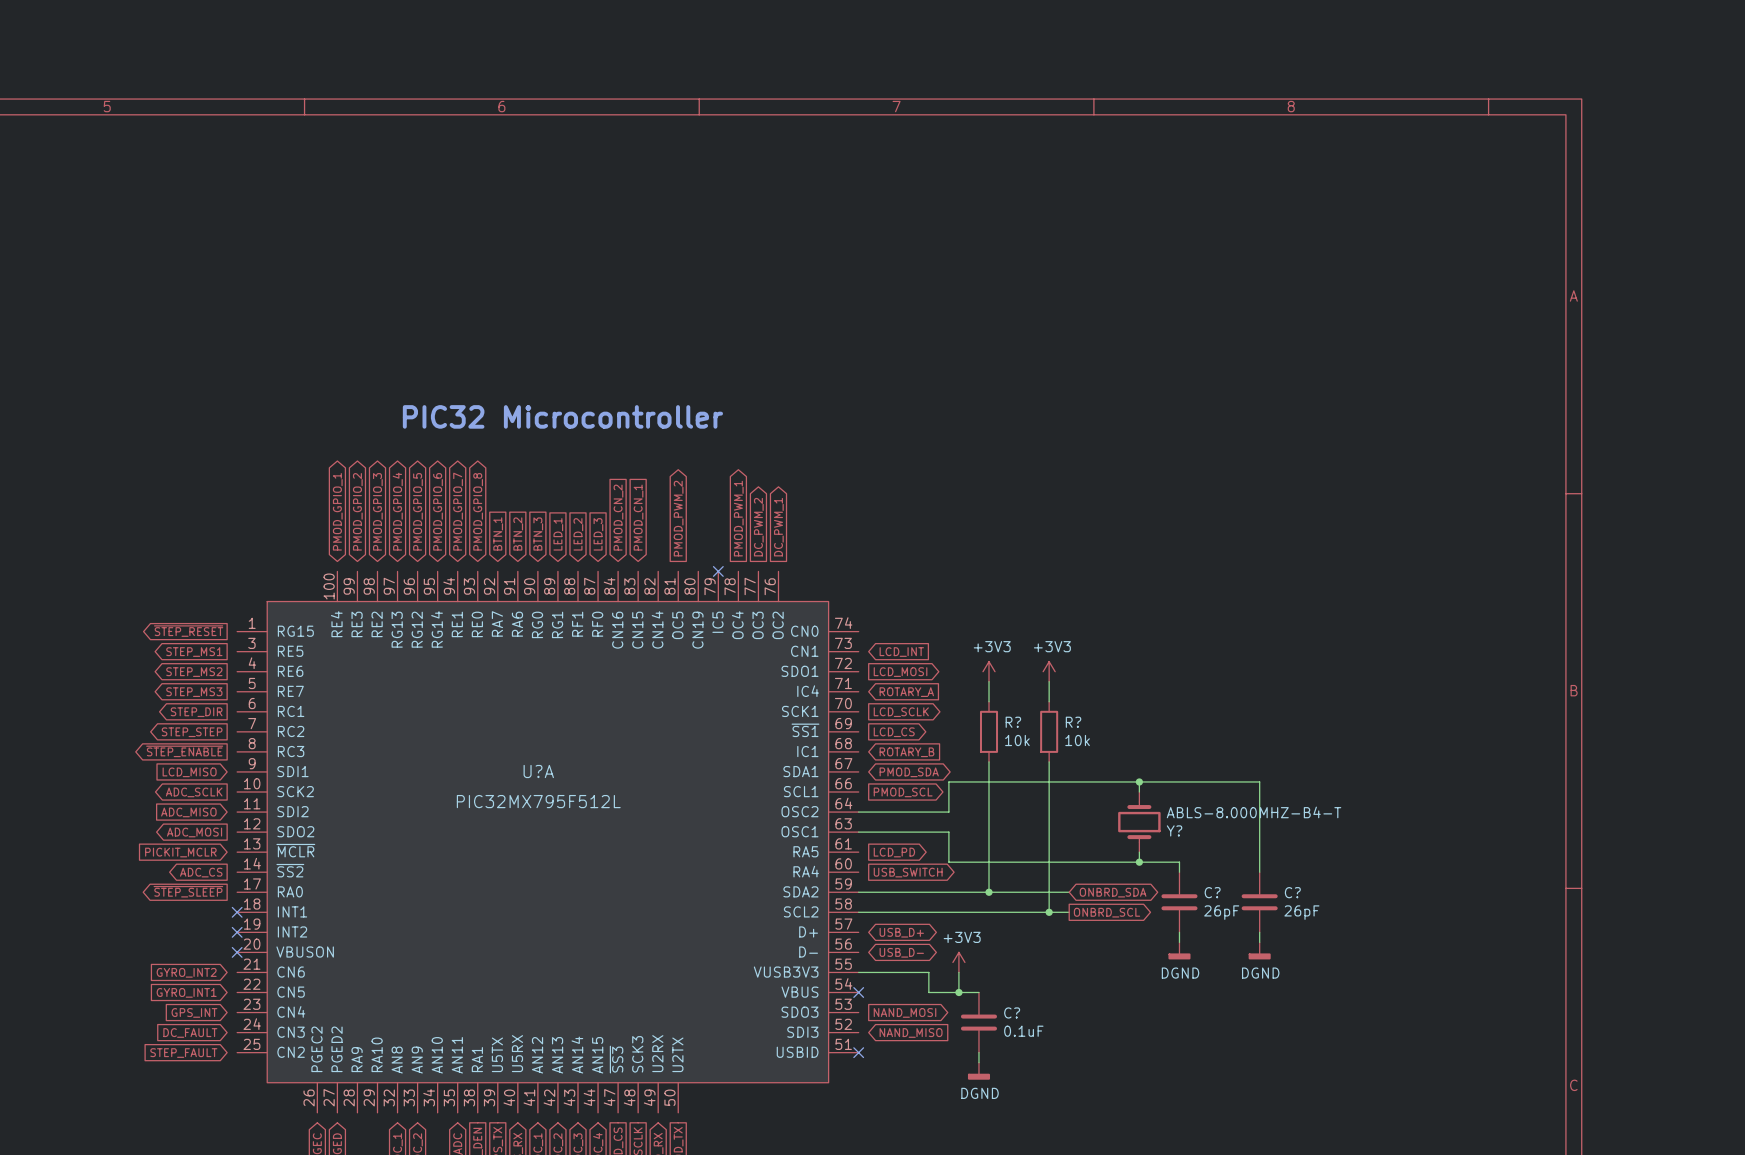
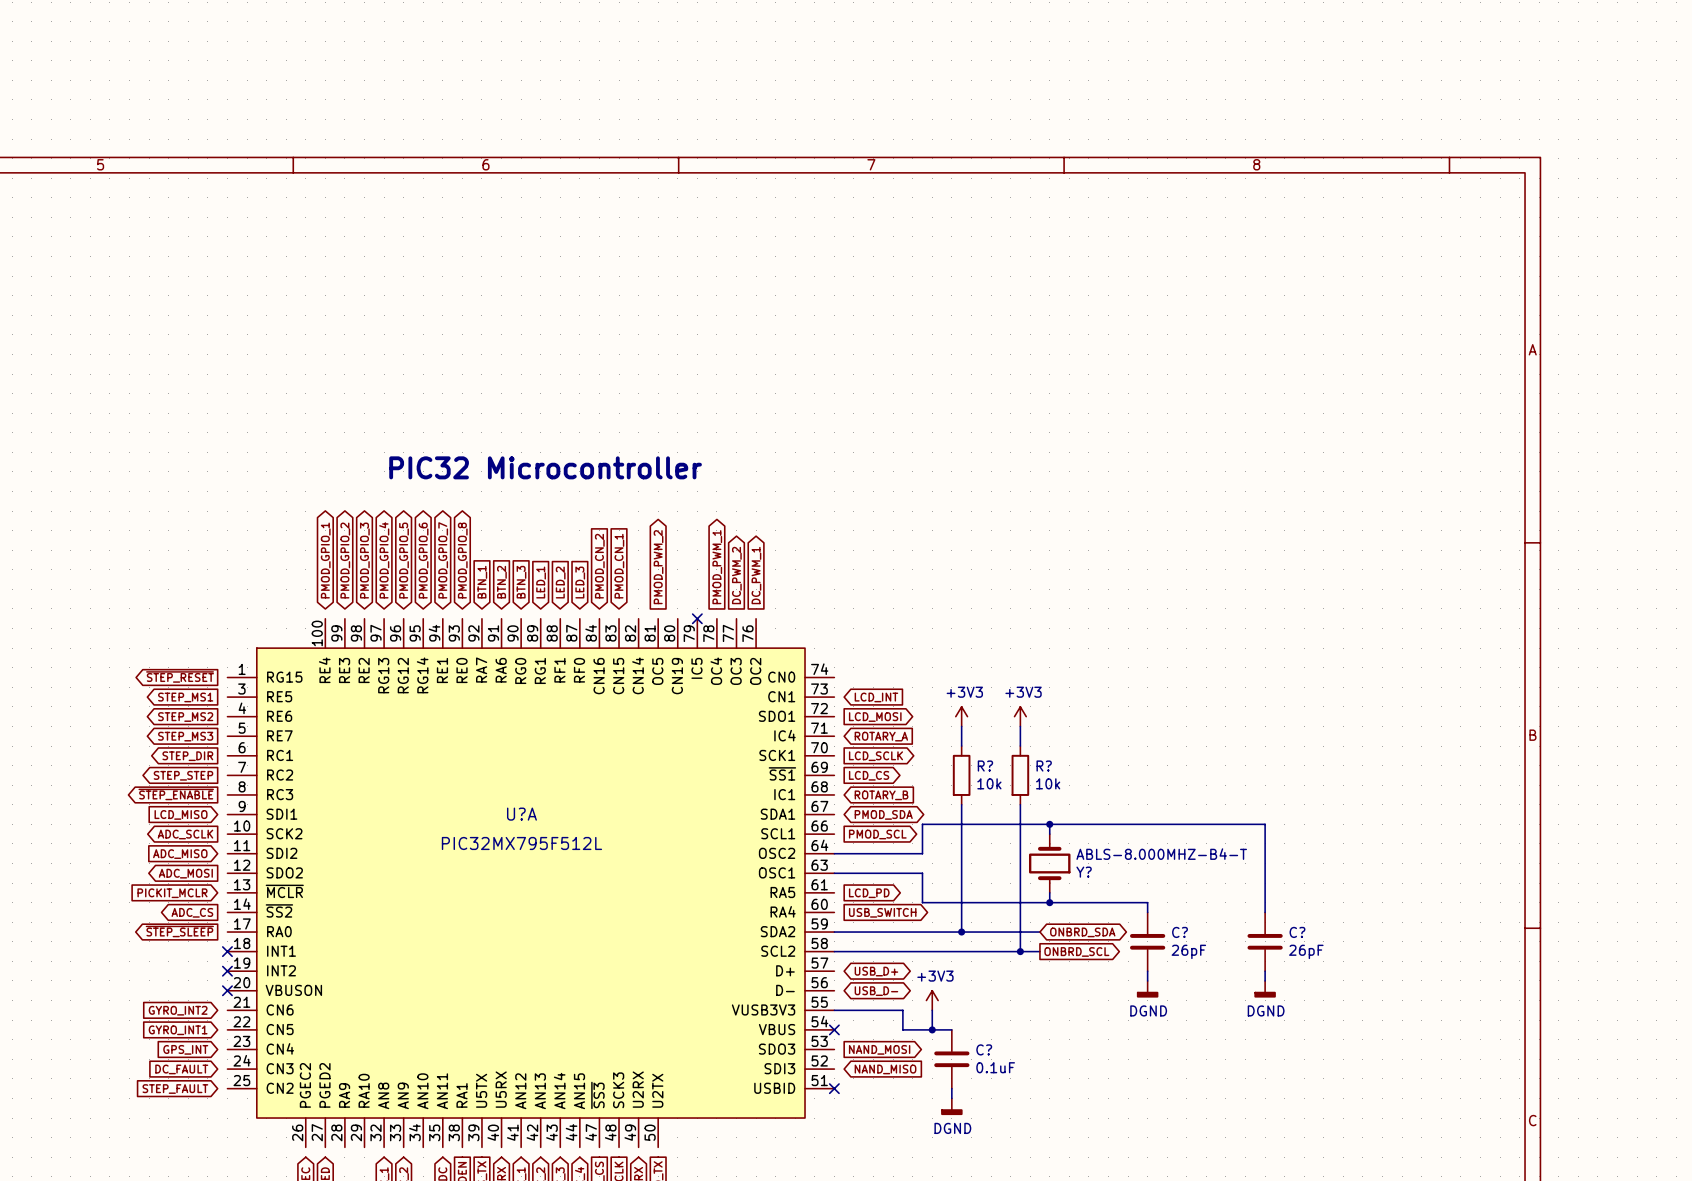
junction: none -> (1049, 824)
wire: (1139, 781) (1139, 792) -> (1049, 824) (1049, 834)
junction: (1139, 781) -> none
wire: (1259, 781) (1259, 872) -> (1225, 824) (1265, 824) (1265, 912)
Y? position: (1139, 822) -> (1049, 863)
wire: (1139, 852) (1139, 862) -> (1049, 892) (1049, 902)
junction: none -> (1049, 902)
junction: (1139, 862) -> none
C? position: (1259, 902) -> (1265, 941)
wire: (1259, 932) (1259, 942) -> (1265, 971) (1265, 980)
power symbol position: DGND (1259, 950) -> DGND (1265, 989)

